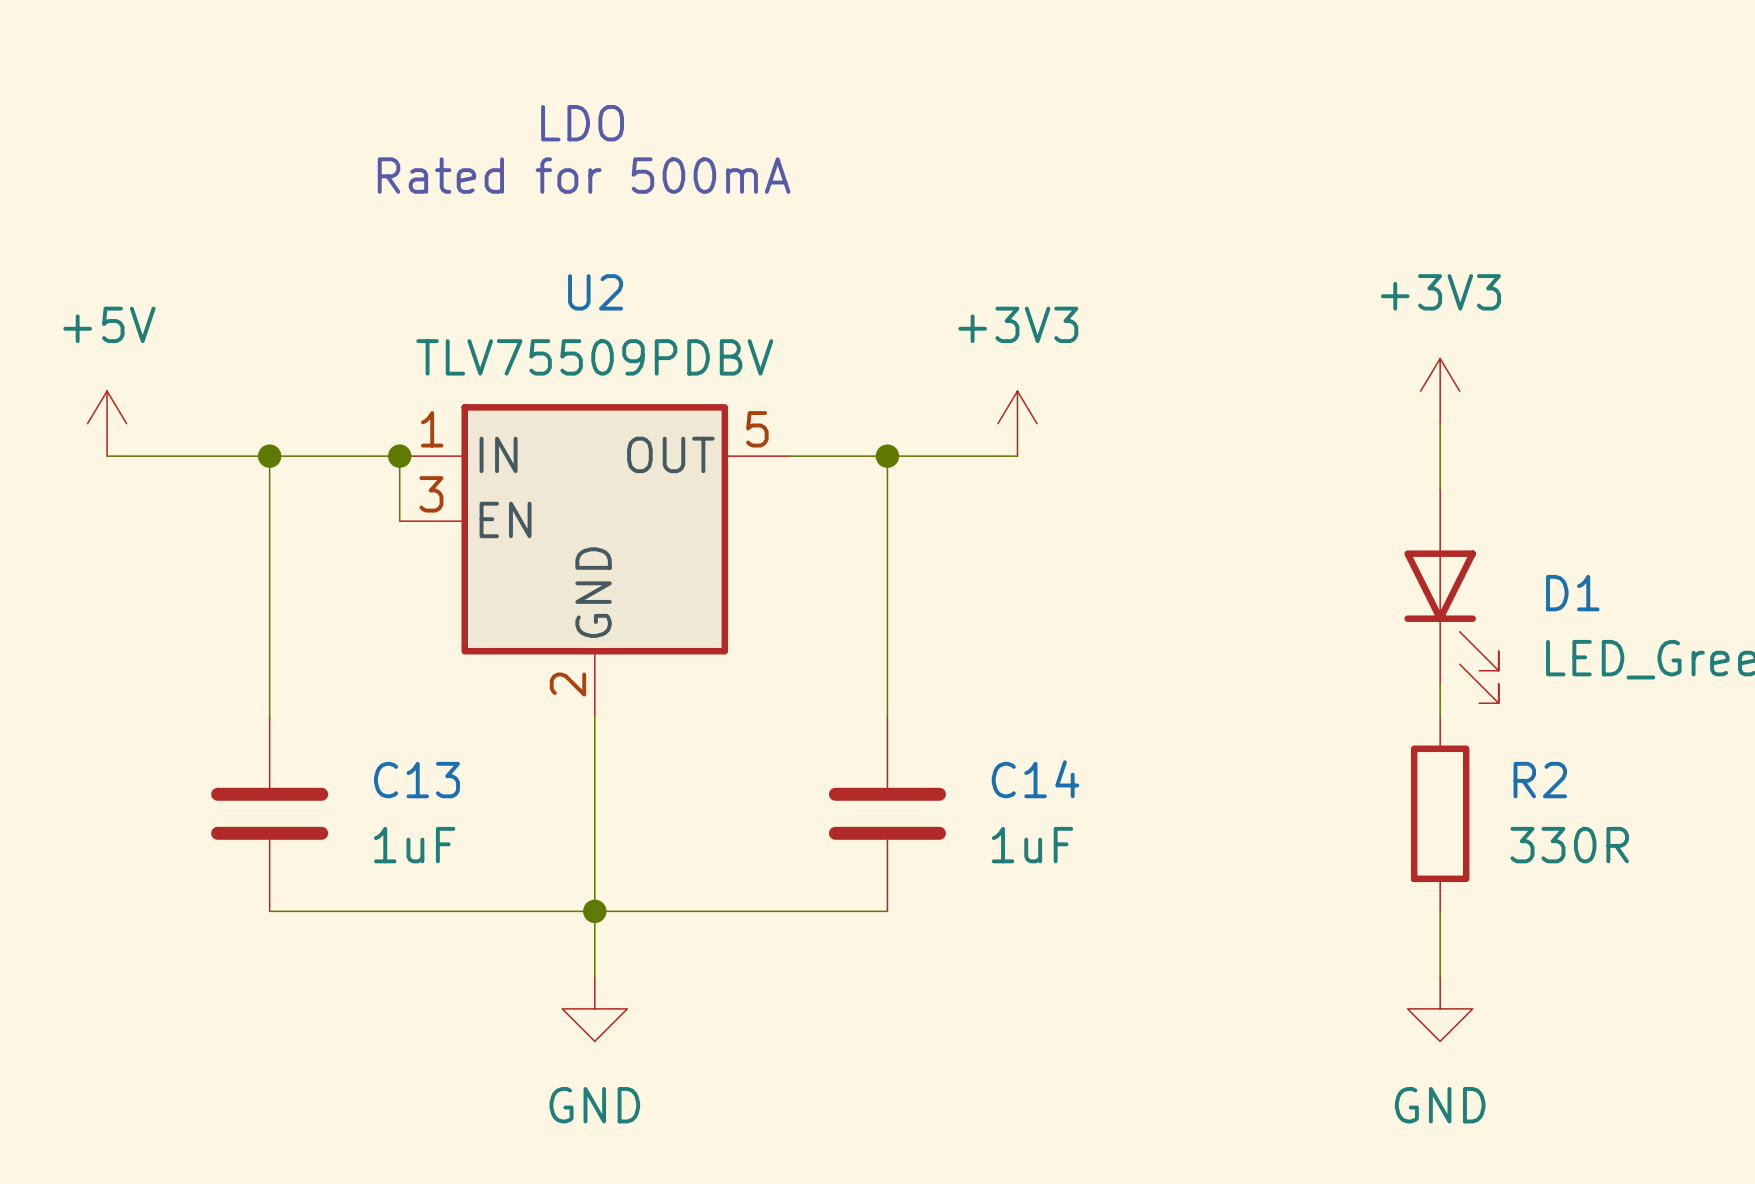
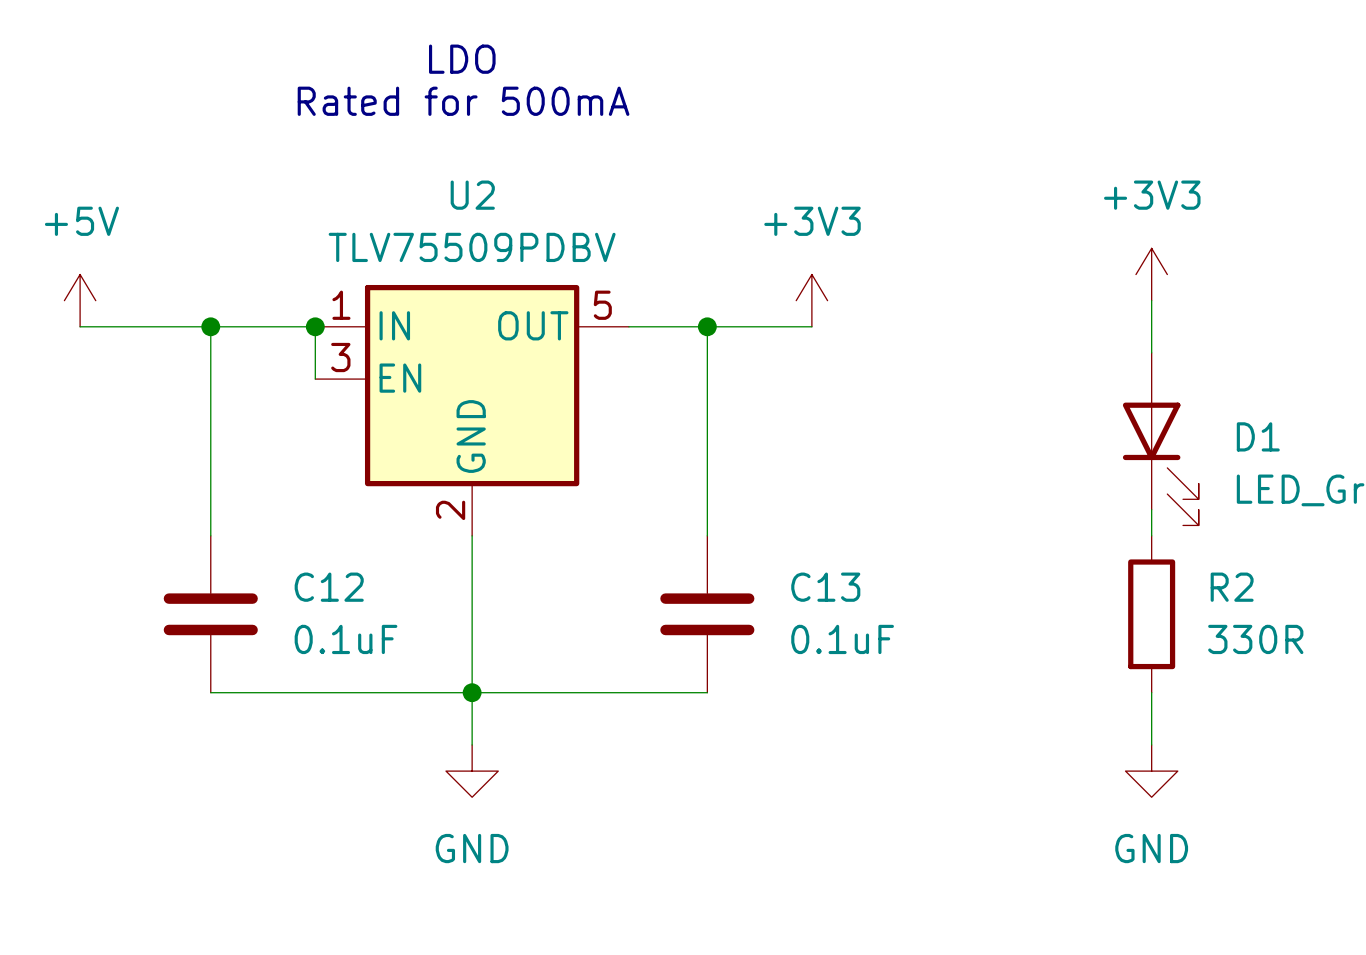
C14 name: C14 (1035, 779) -> C13 (825, 587)
C13 name: C13 (416, 780) -> C12 (329, 587)
C13 value: 1uF (414, 845) -> 0.1uF (346, 639)
C14 value: 1uF (1032, 845) -> 0.1uF (842, 639)

